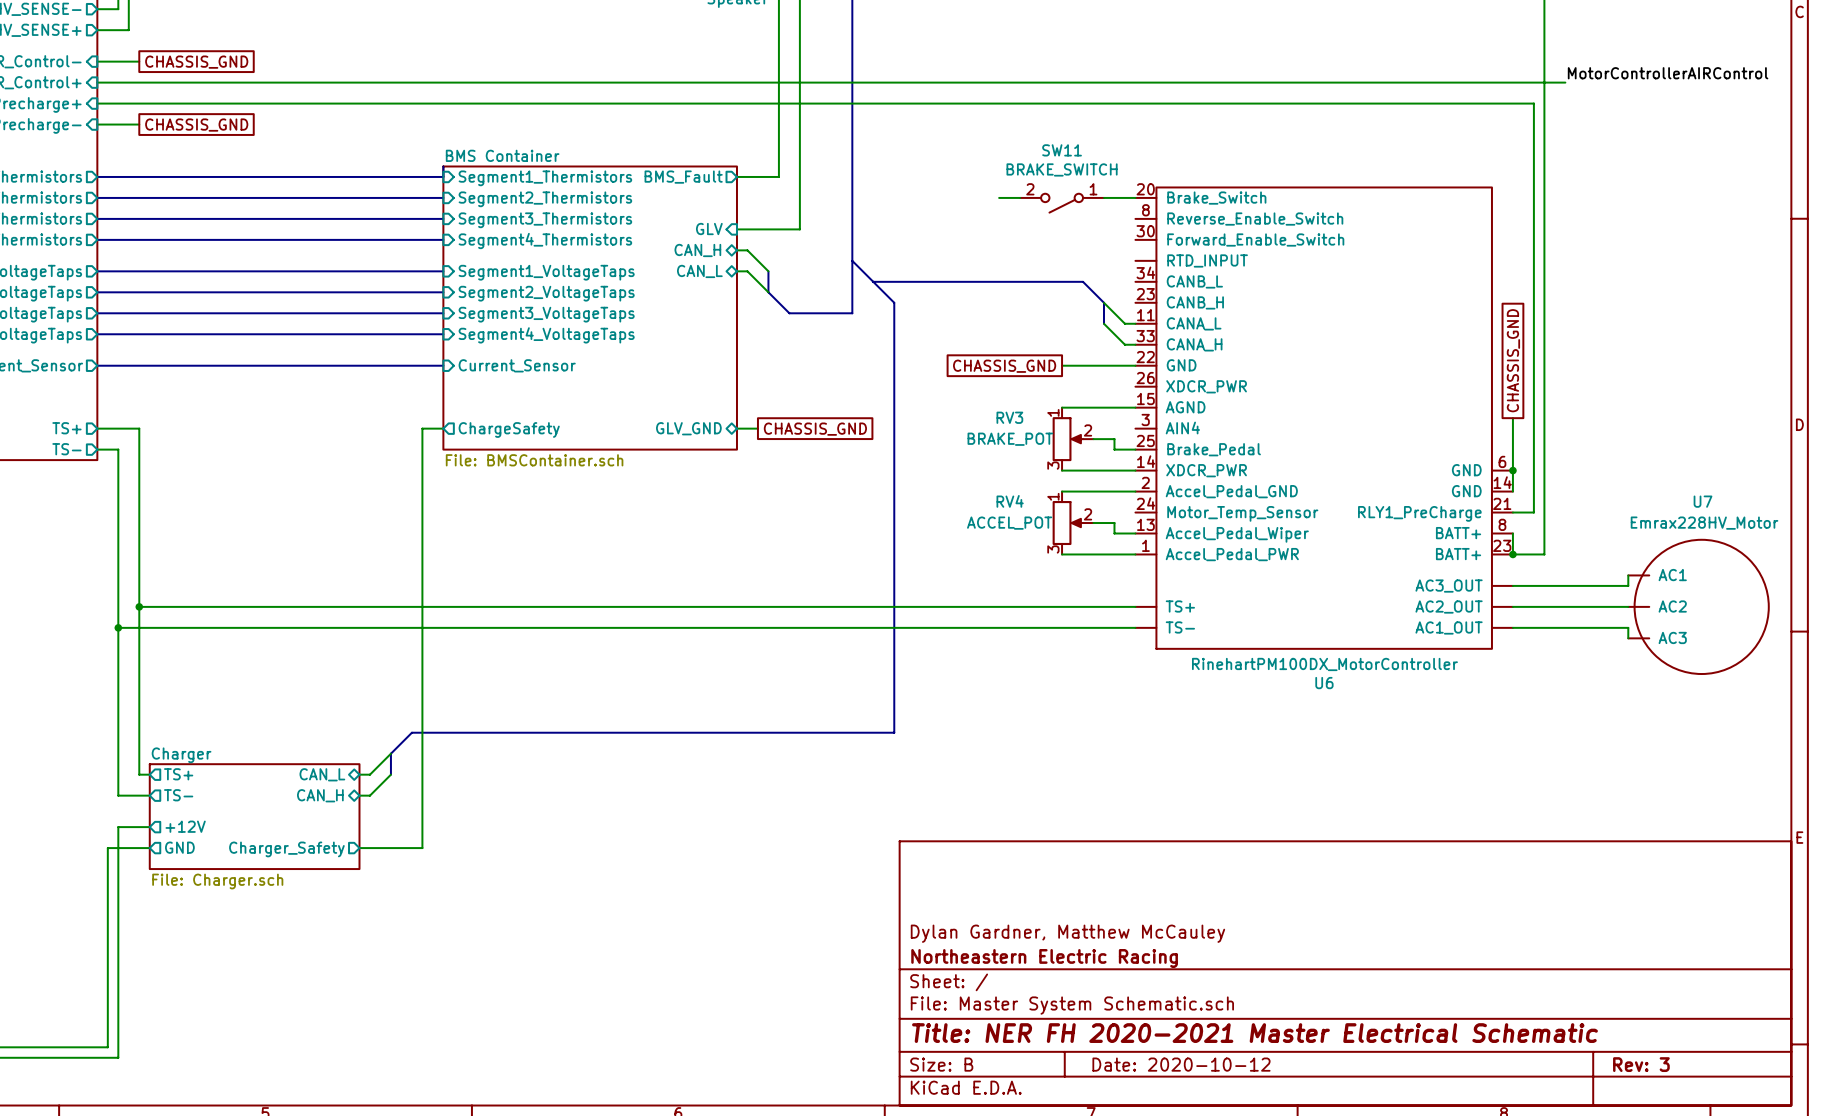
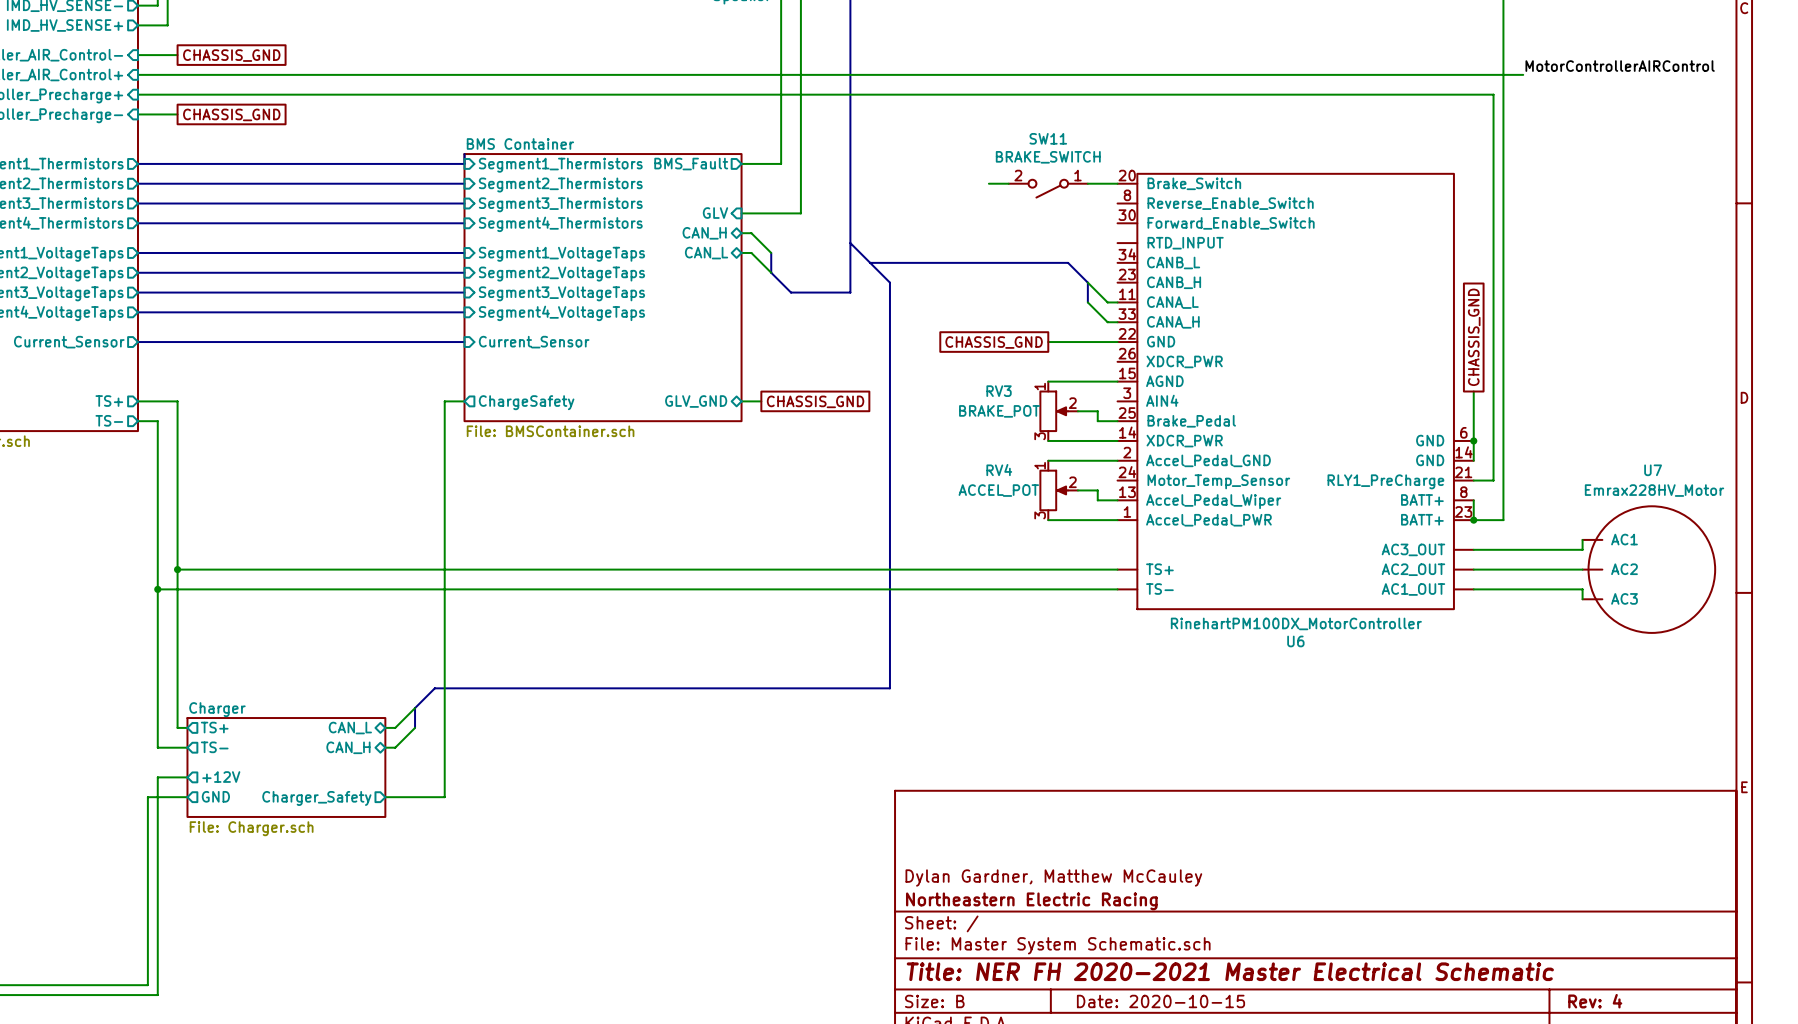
title block: Date: 2020-10-12 (1181, 1064) -> Date: 2020-10-15 (1160, 1001)
title block: Rev: 3 (1641, 1064) -> Rev: 4 (1595, 1001)

